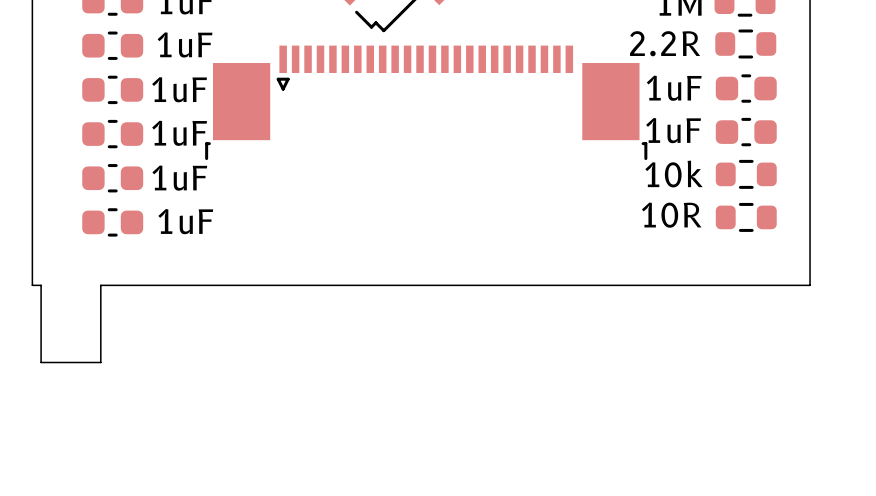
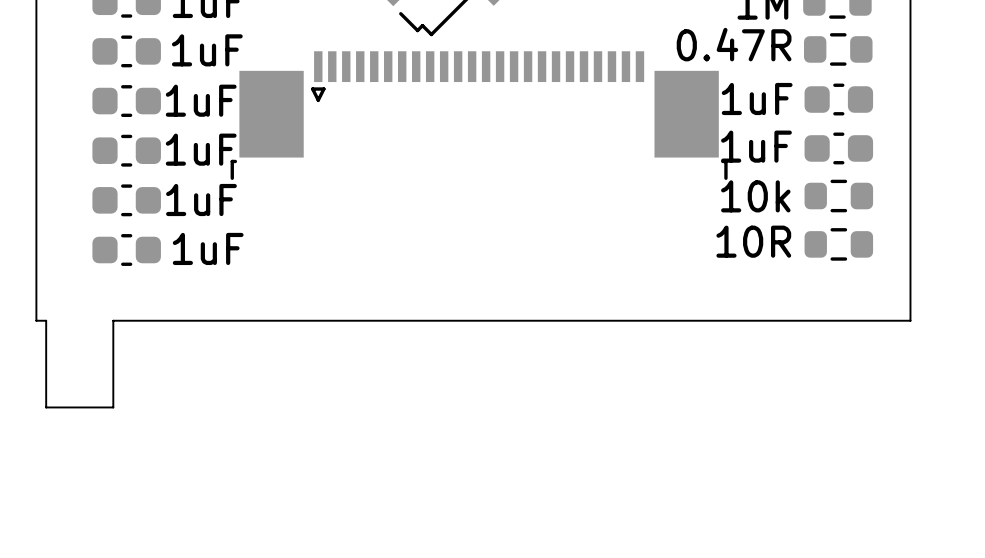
part value: 2.2R (665, 43) -> 0.47R (734, 44)

